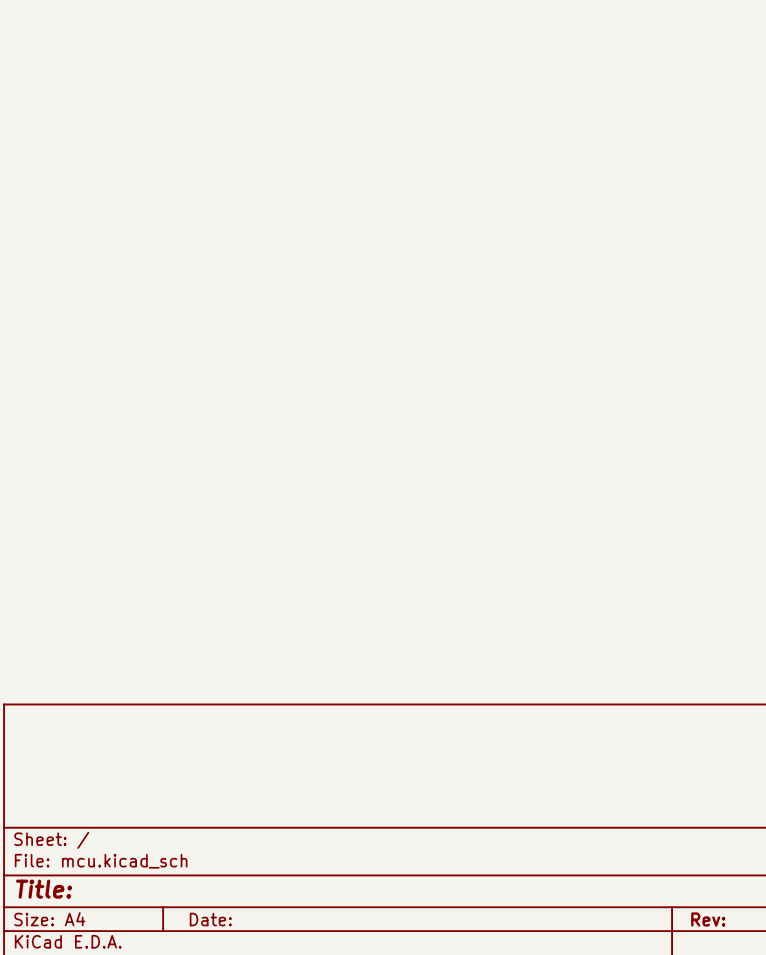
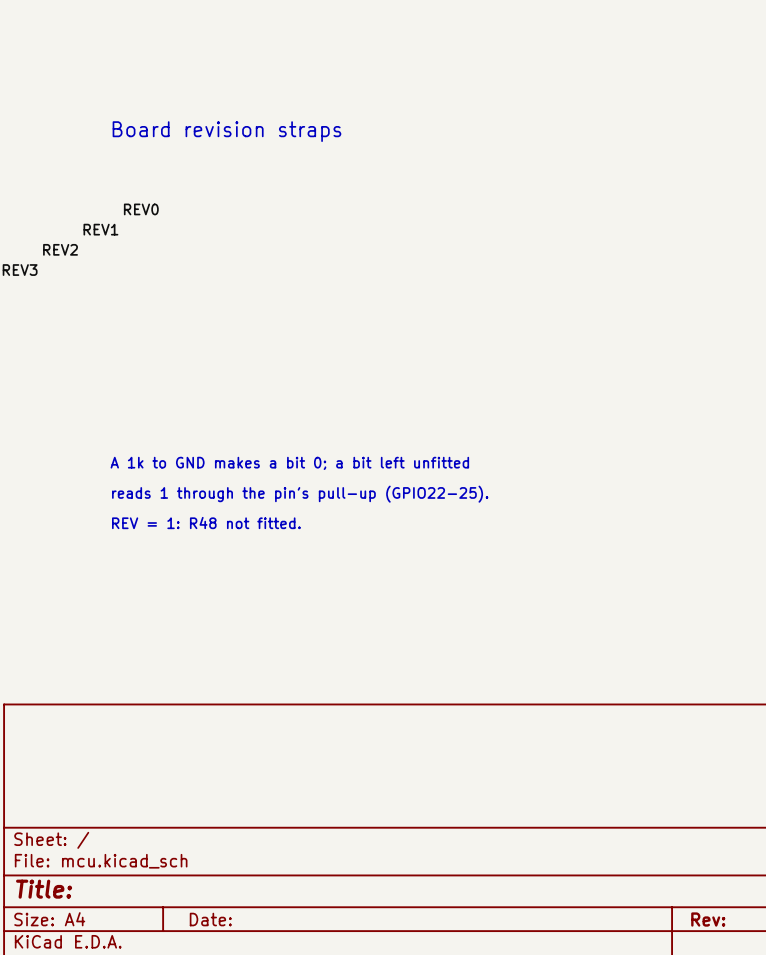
text: none -> Board revision straps (226, 131)
label: none -> REV0 (141, 209)
label: none -> REV1 (100, 229)
label: none -> REV2 (60, 249)
label: none -> REV3 (20, 270)
text: none -> A 1k to GND makes a bit 0; a bit left unfitted (289, 463)
text: none -> reads 1 through the pin's pull-up (GPIO22-25). (300, 494)
text: none -> REV = 1: R48 not fitted. (206, 523)

